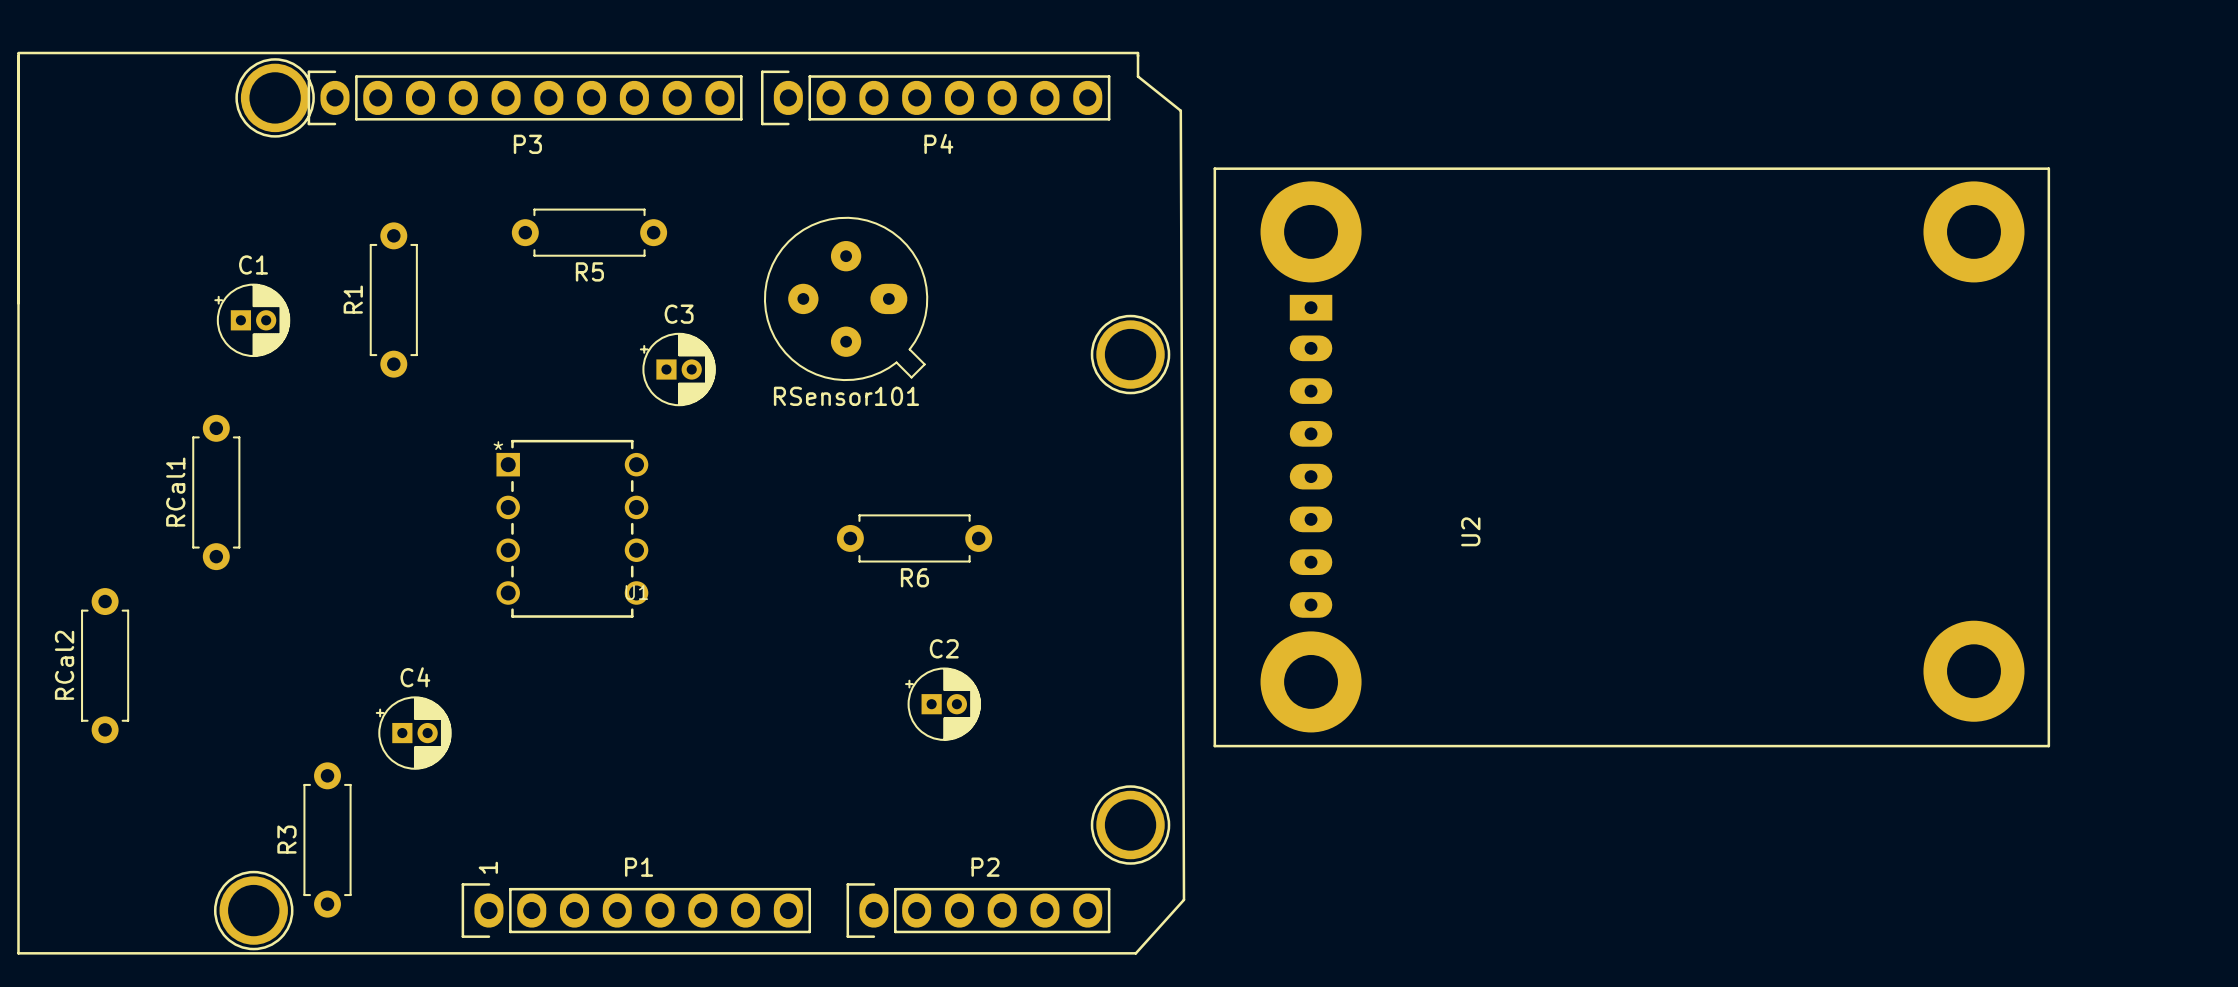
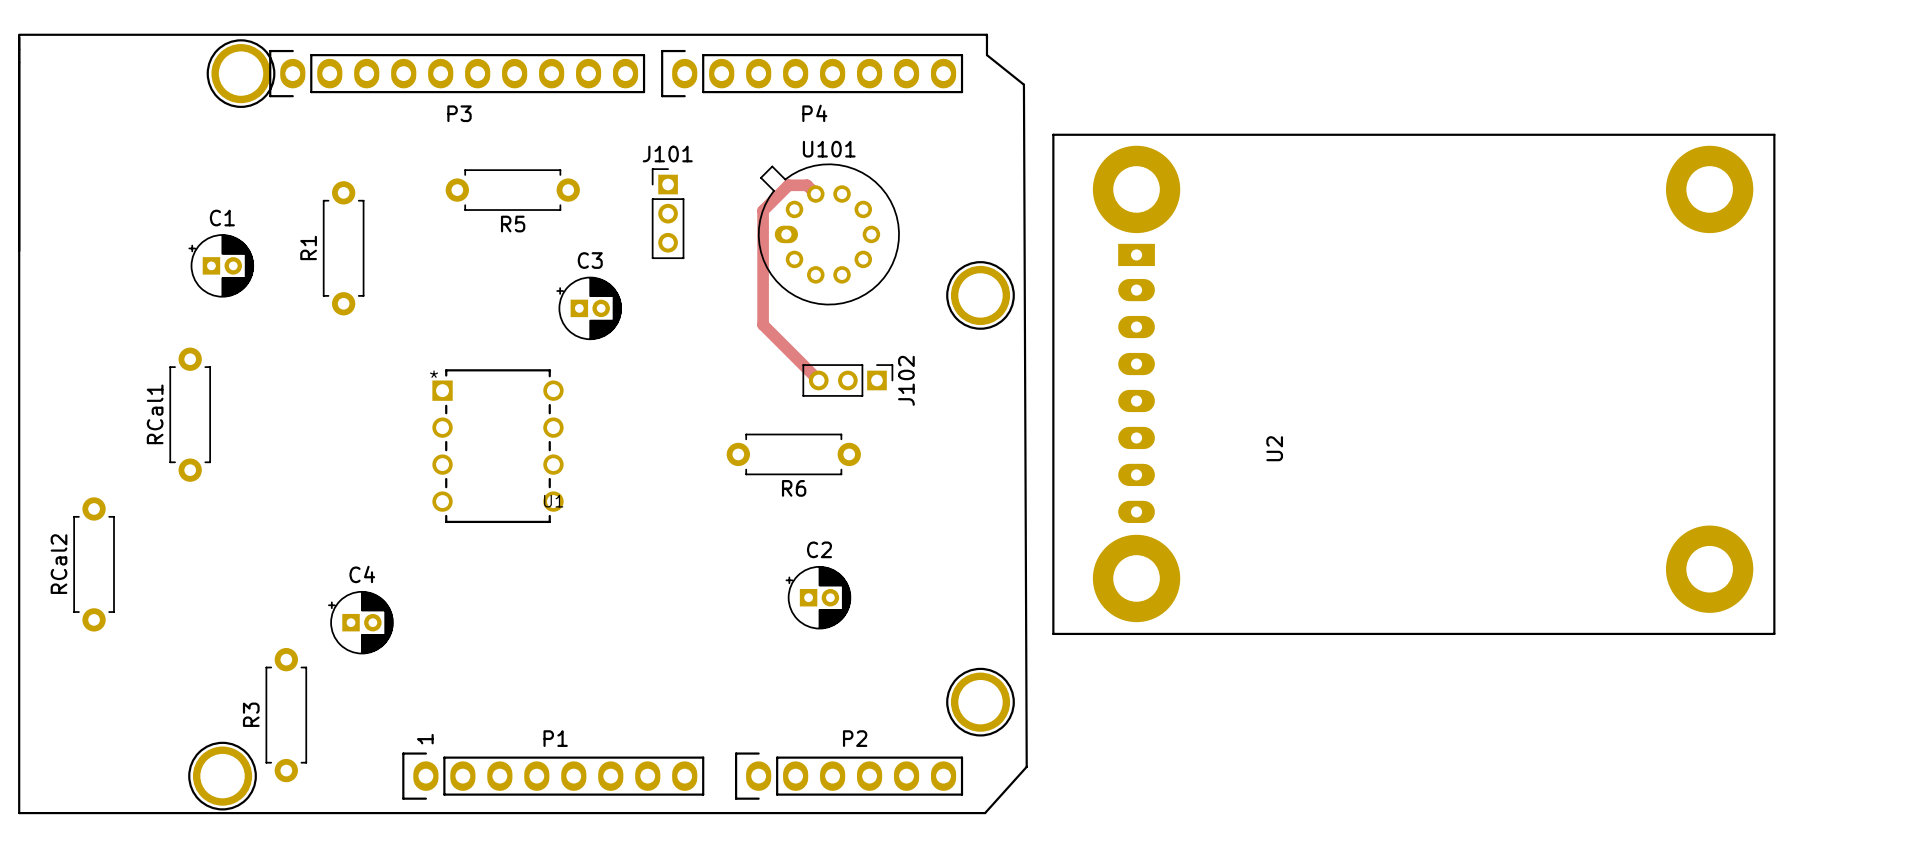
track: none -> (815, 194) (807, 185) (788, 185) (763, 210) (763, 324) (818, 380)
J101: none -> (668, 213)
U101: none -> (828, 234)
RSensor101: (846, 298) -> none
J102: none -> (847, 380)

